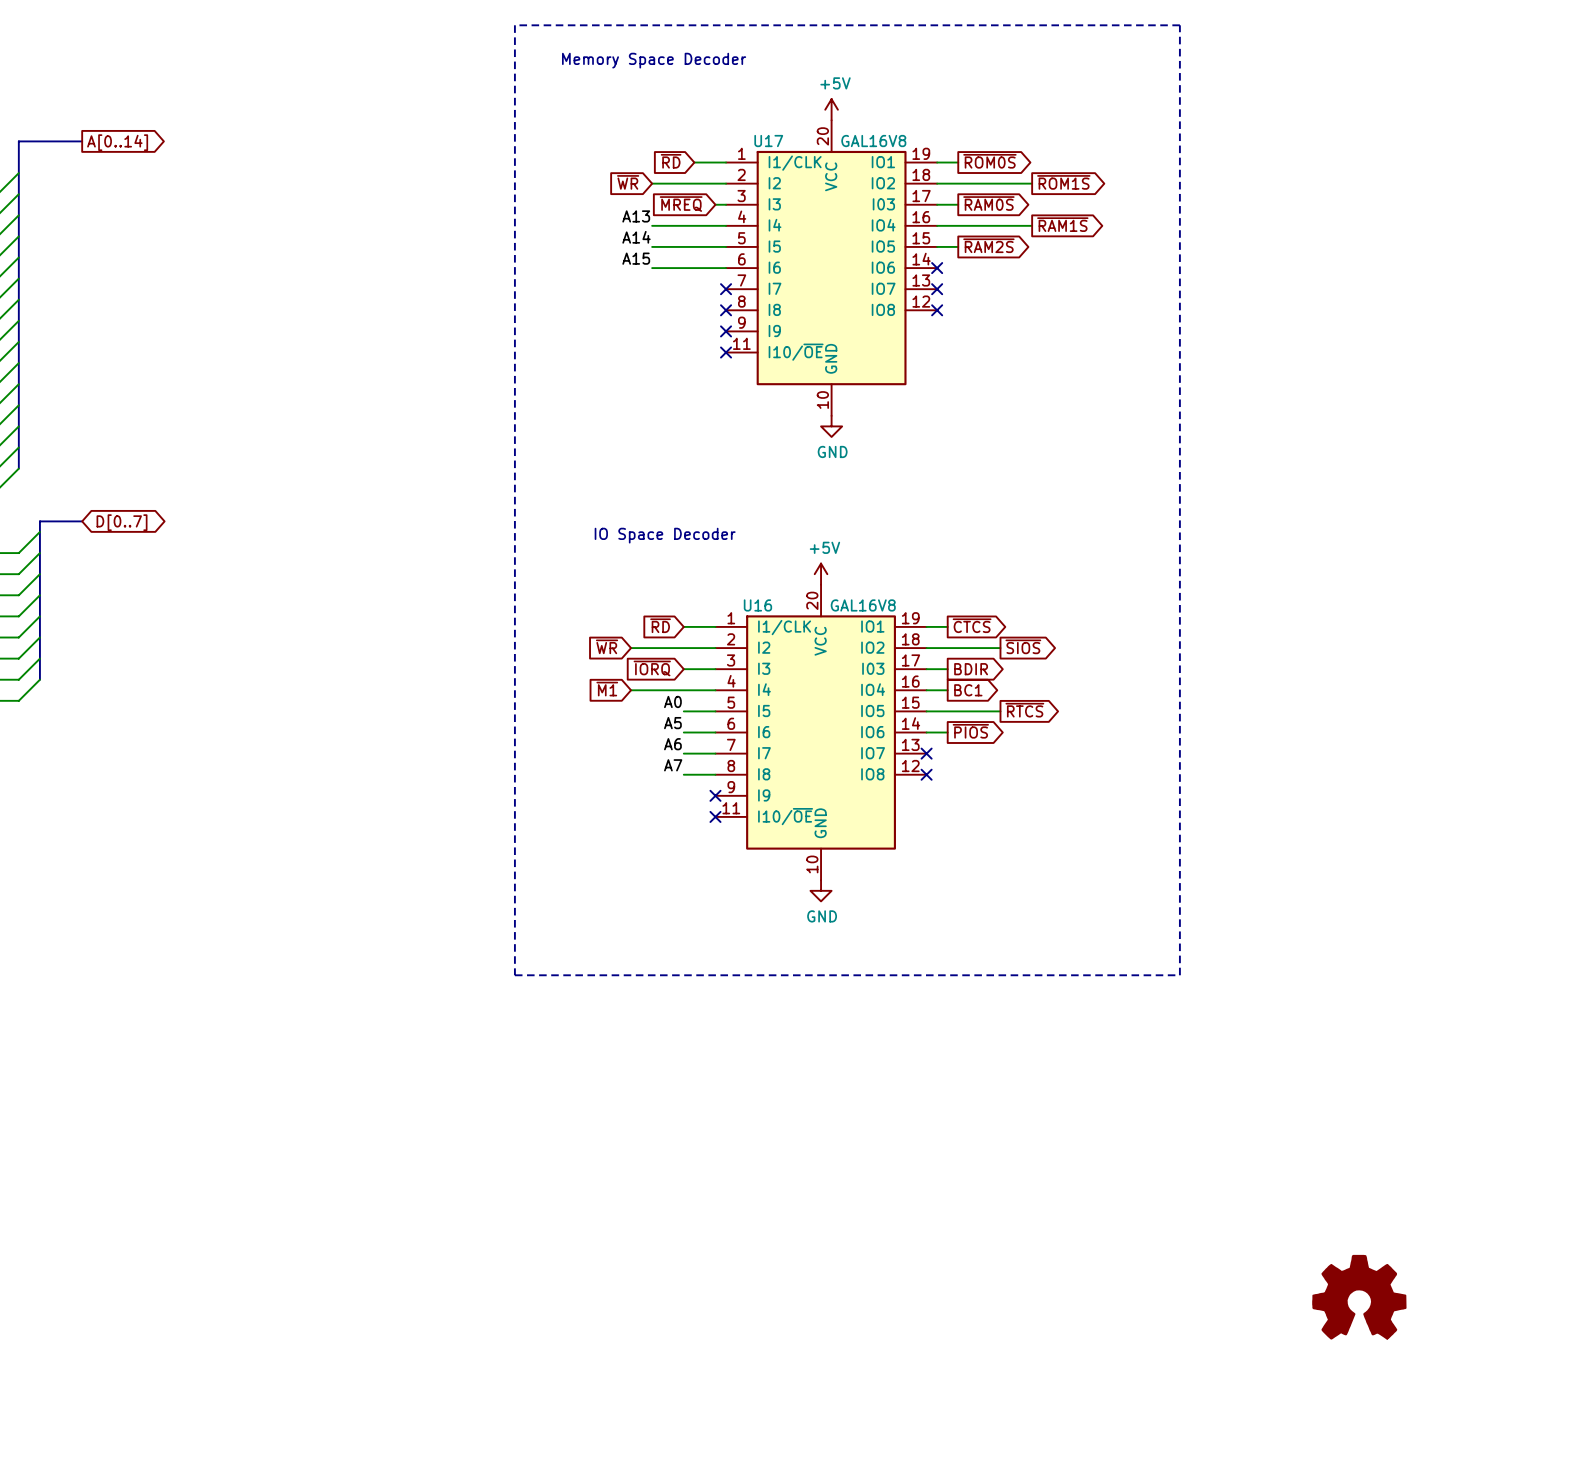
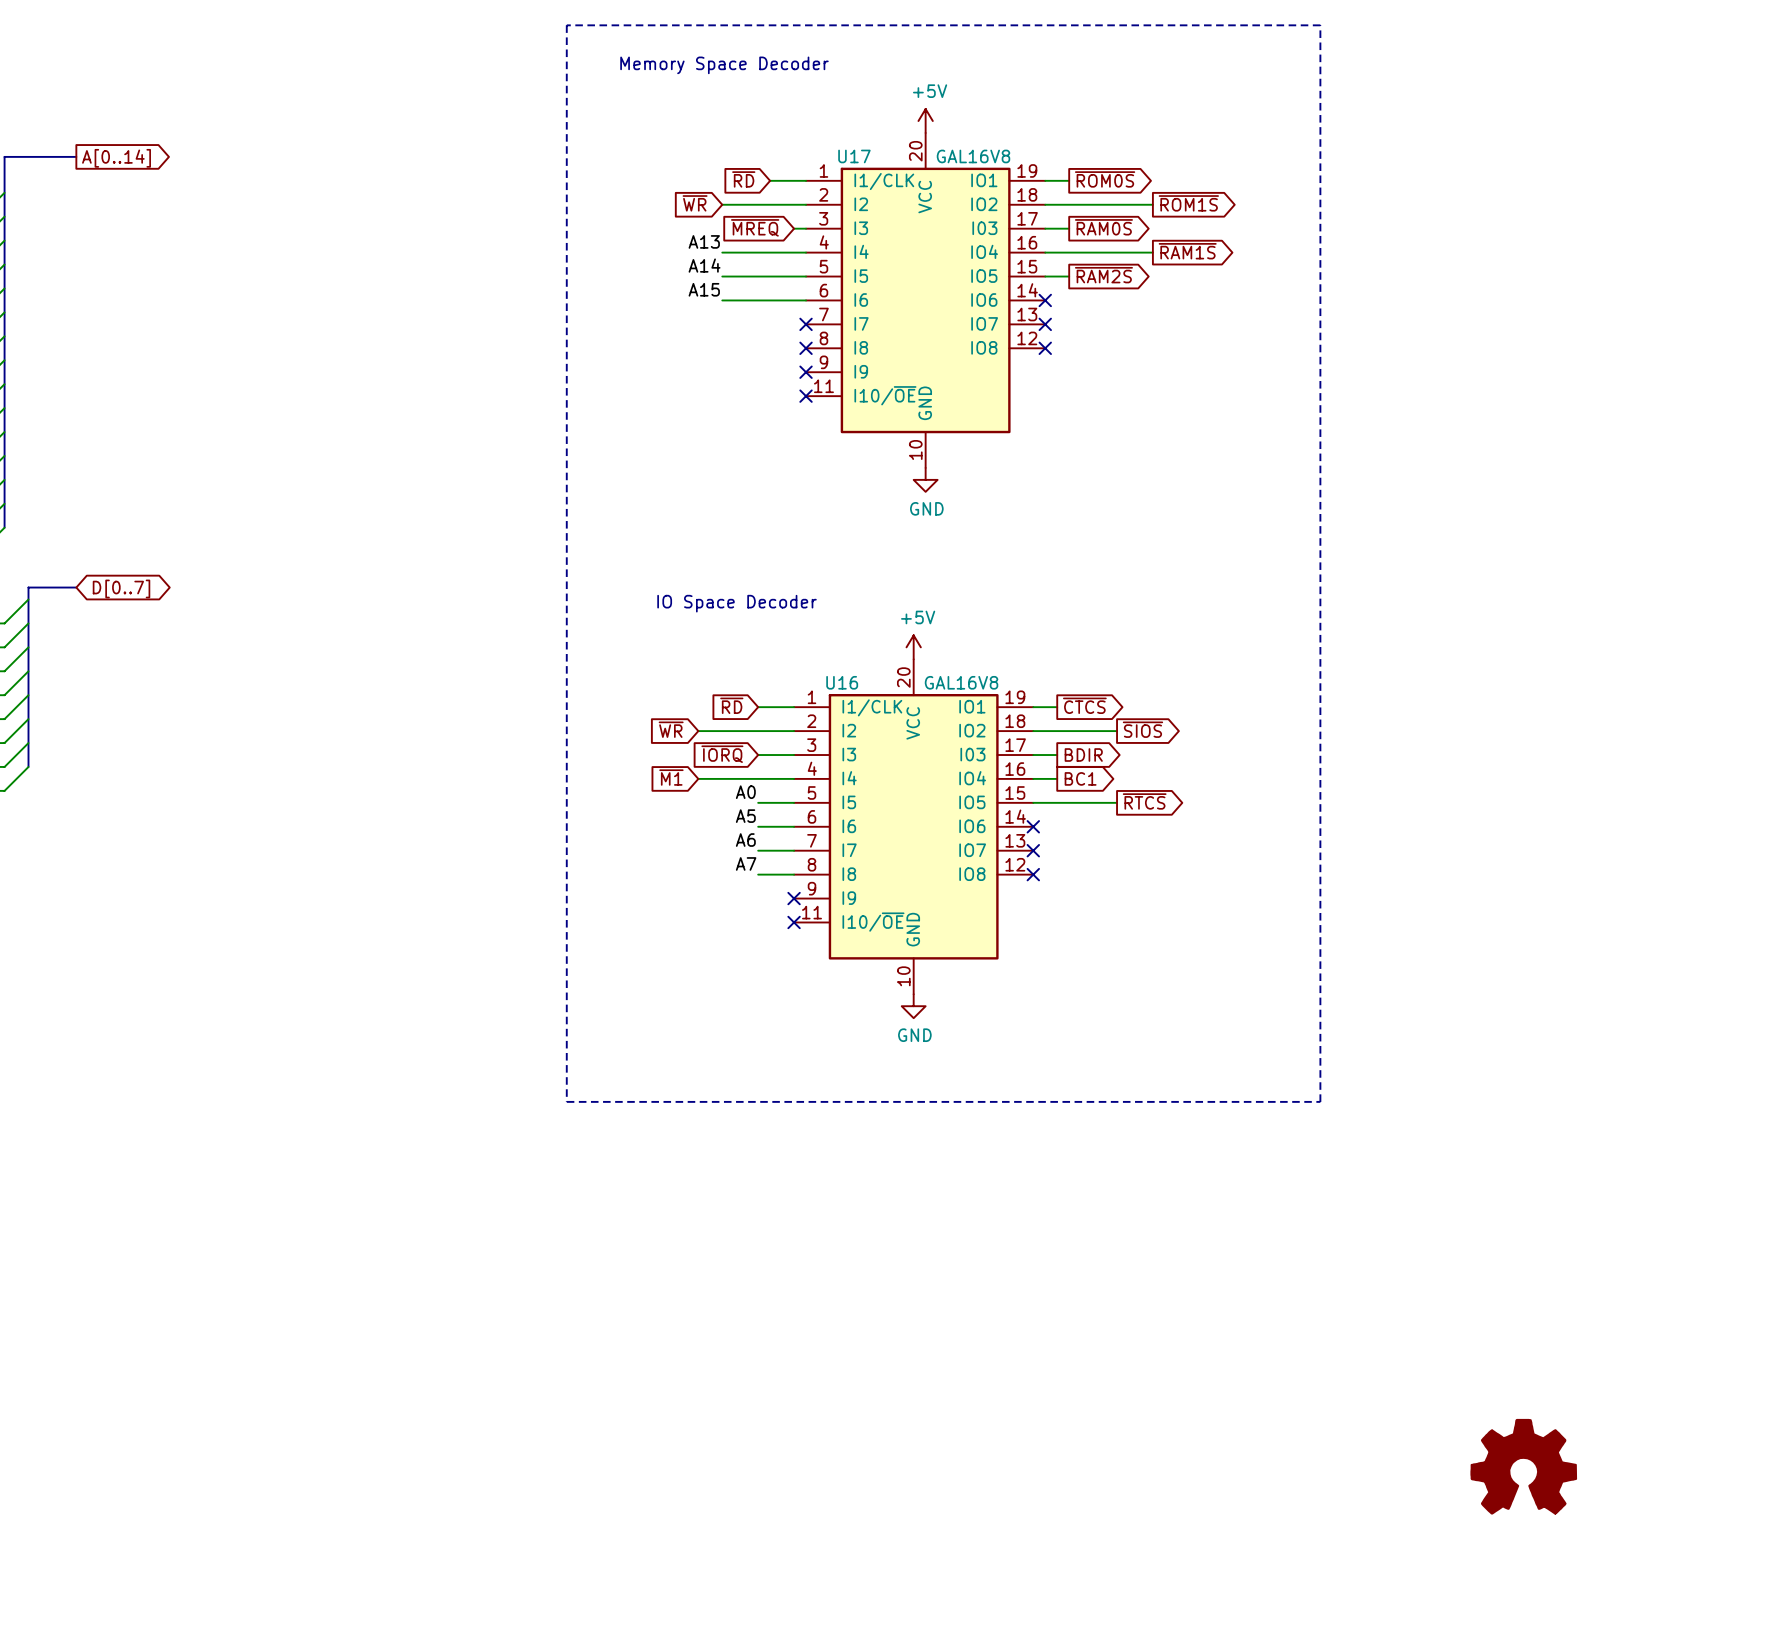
global label: ~{PIOS} (970, 731) -> none
wire: (926, 732) (947, 732) -> none
no-connect mark: none -> (1033, 826)

